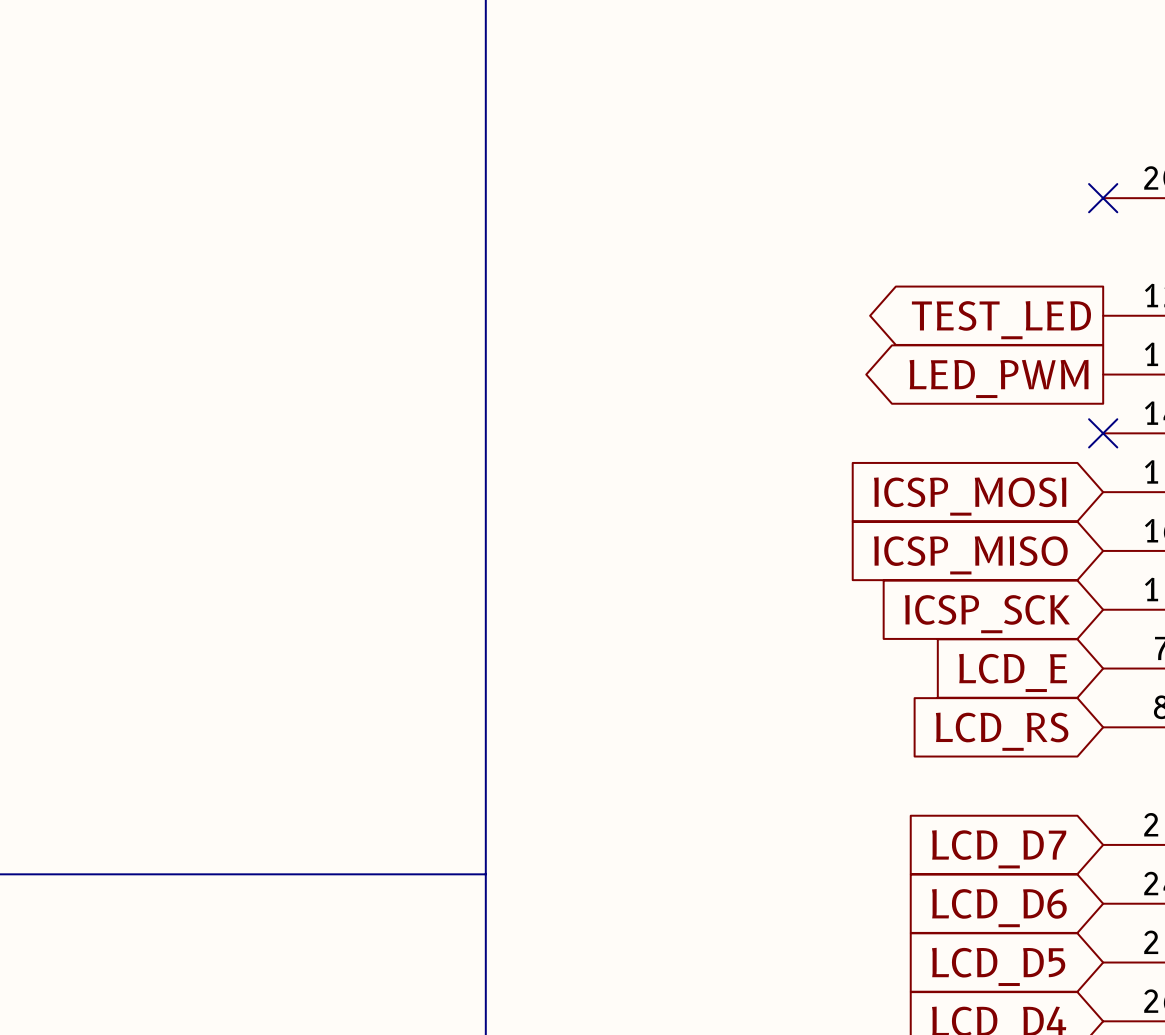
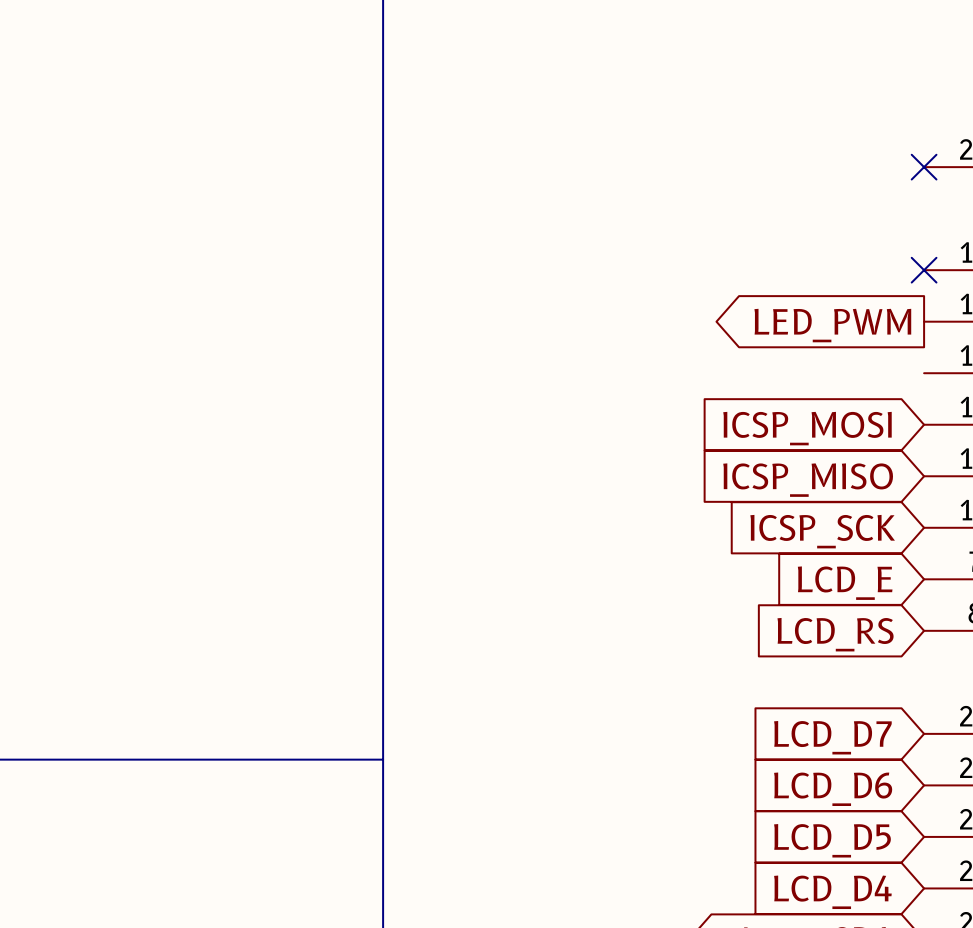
global label: TEST_LED (1001, 320) -> none
no-connect mark position: (1103, 433) -> (924, 270)

